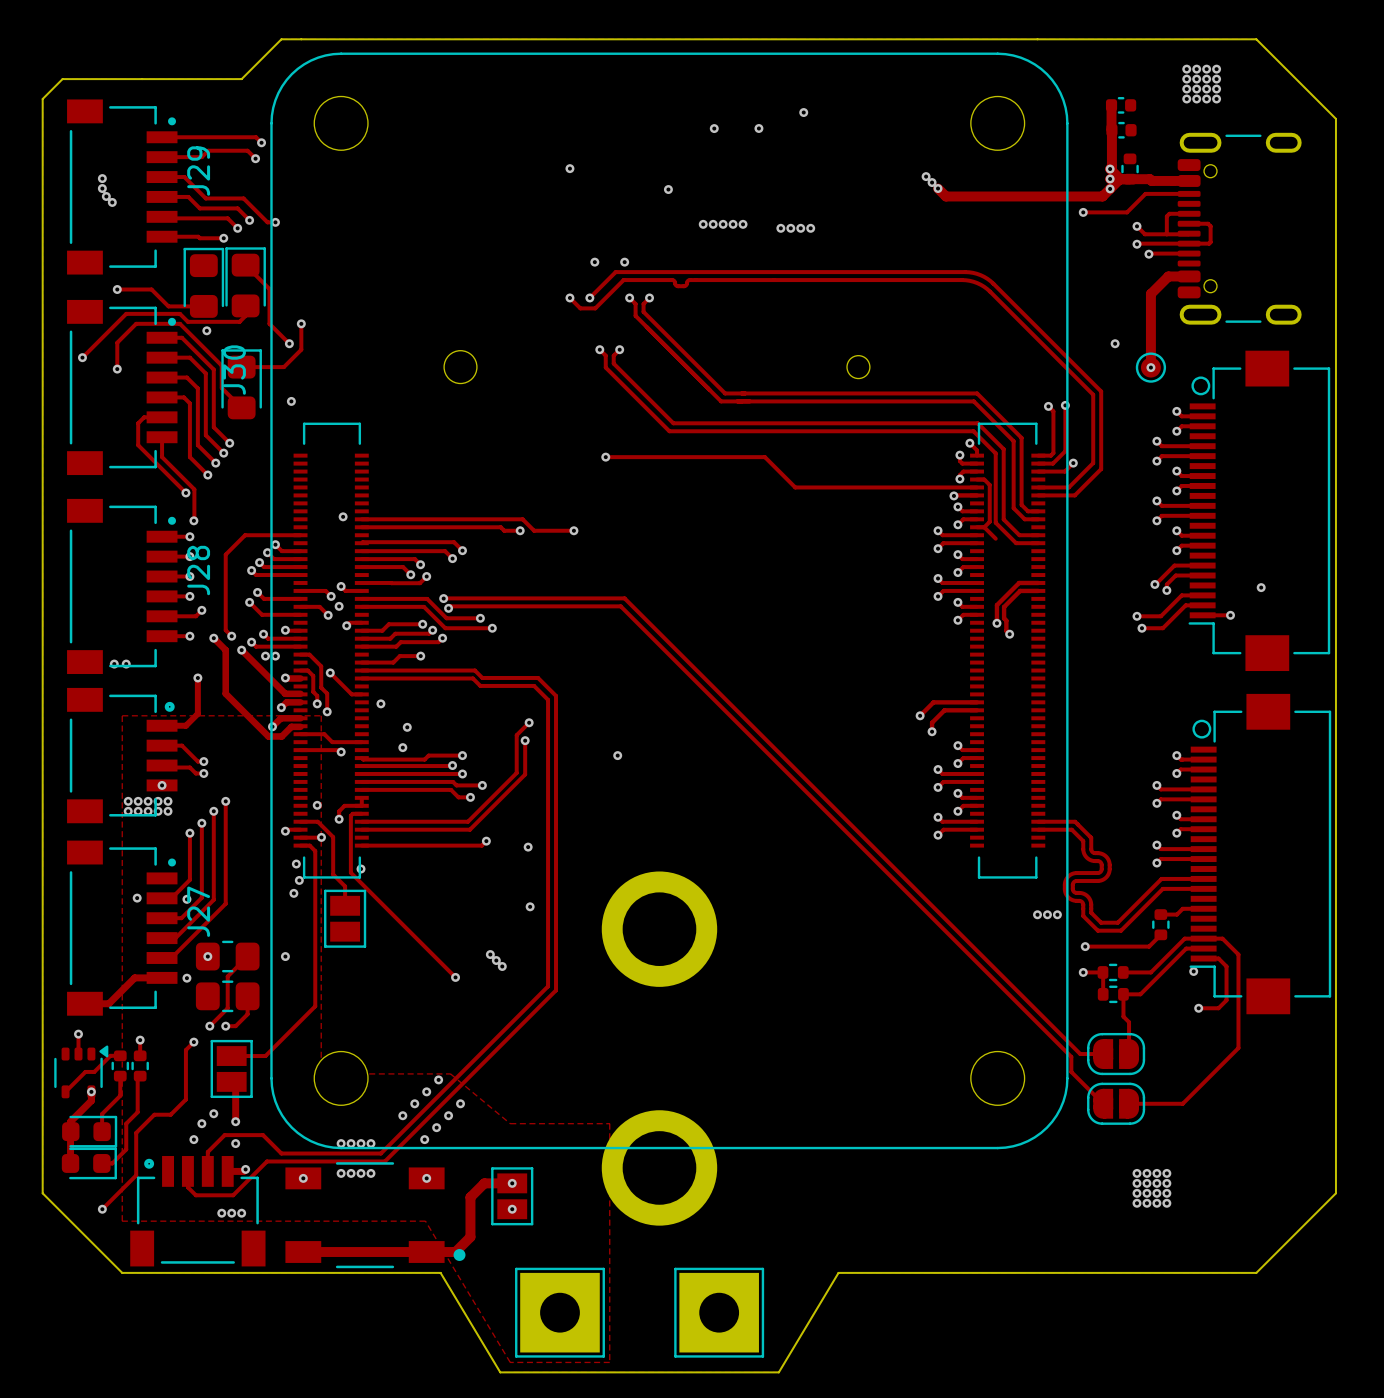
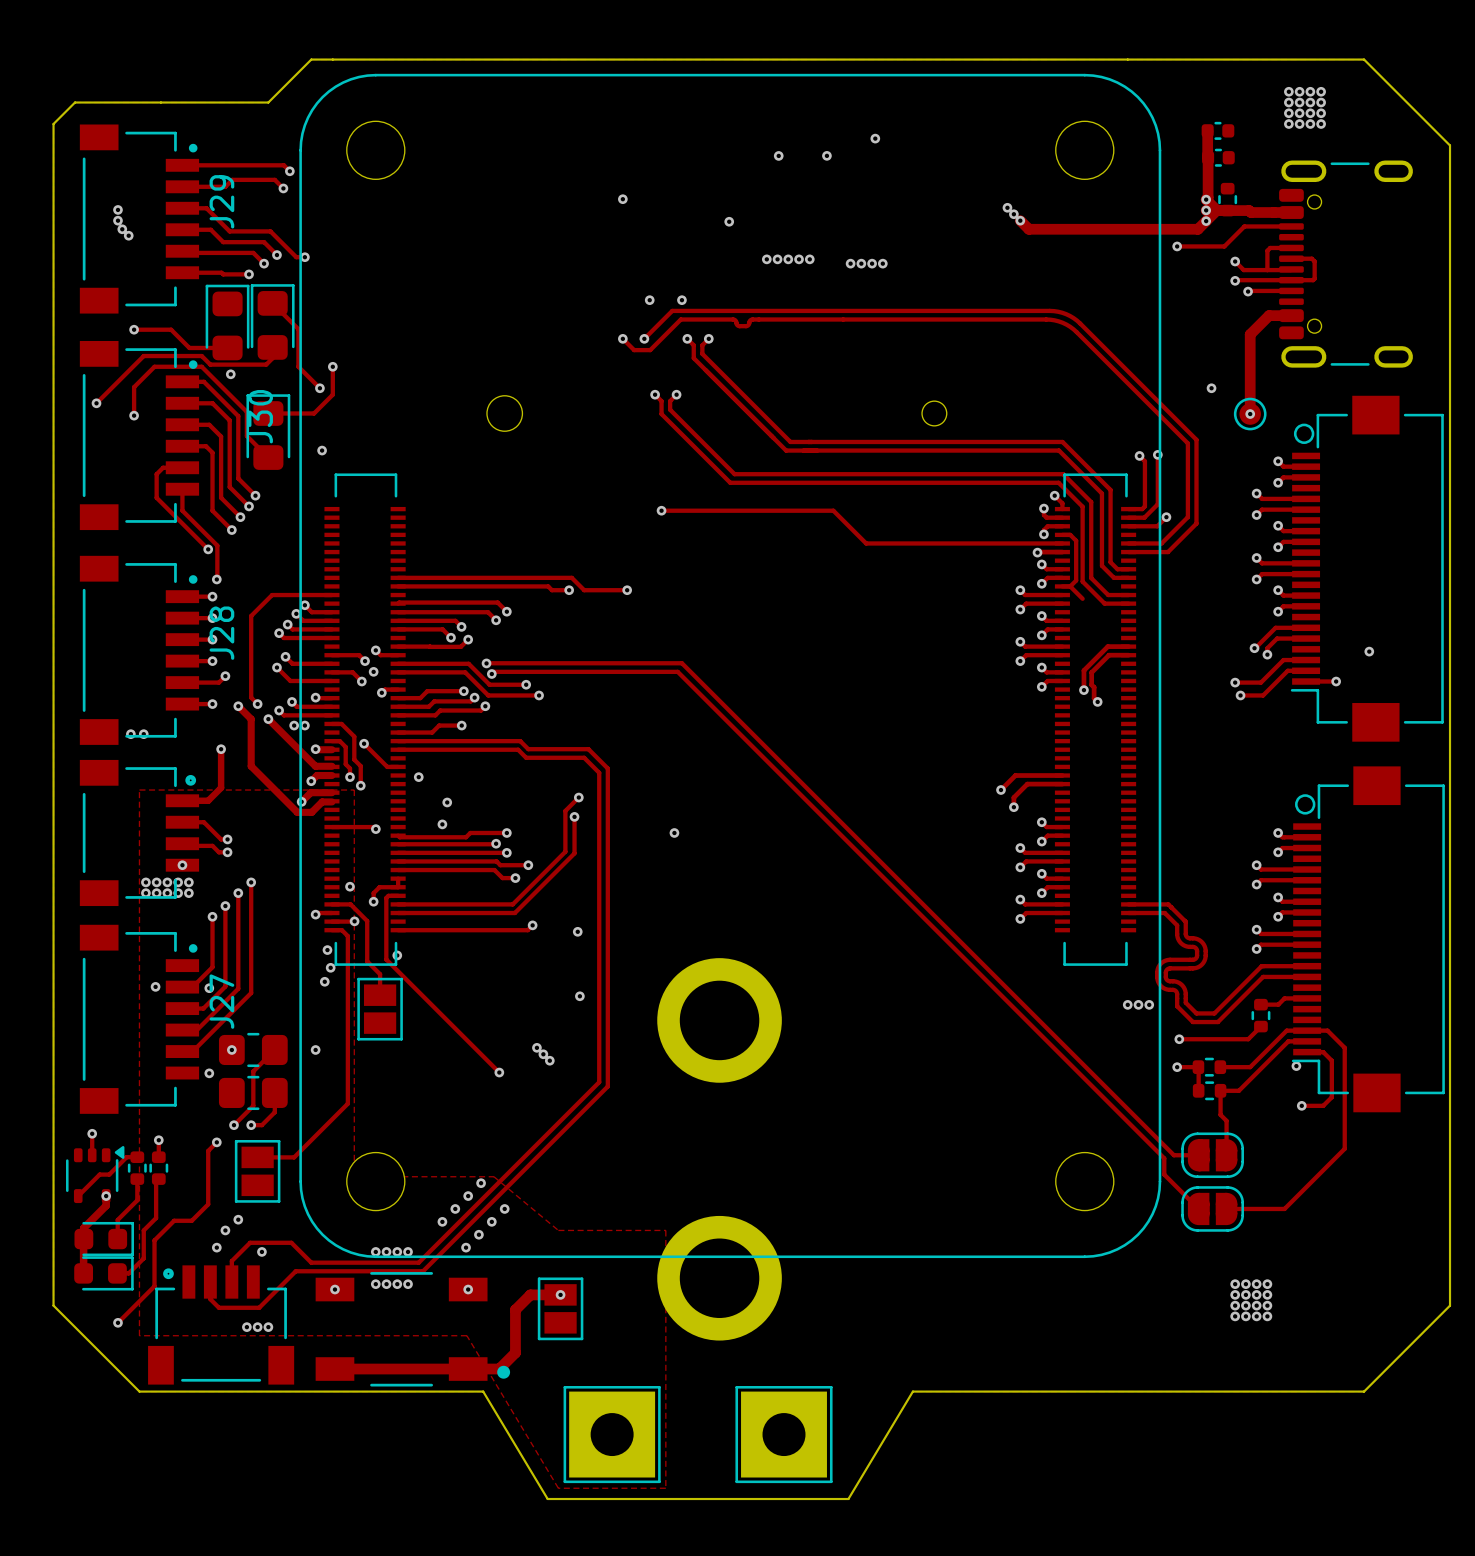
via: (343, 516) -> none
track: (300, 734) (324, 734) (332, 742) (361, 742) -> none
track: (162, 977) (134, 977) (108, 1003) (84, 1003) -> none
track: (231, 1081) (235, 1085) (235, 1121) -> none
via: (235, 1121) -> none
track: (245, 1169) (243, 1171) (227, 1171) -> none
via: (245, 1169) -> none
via: (512, 1209) -> none

